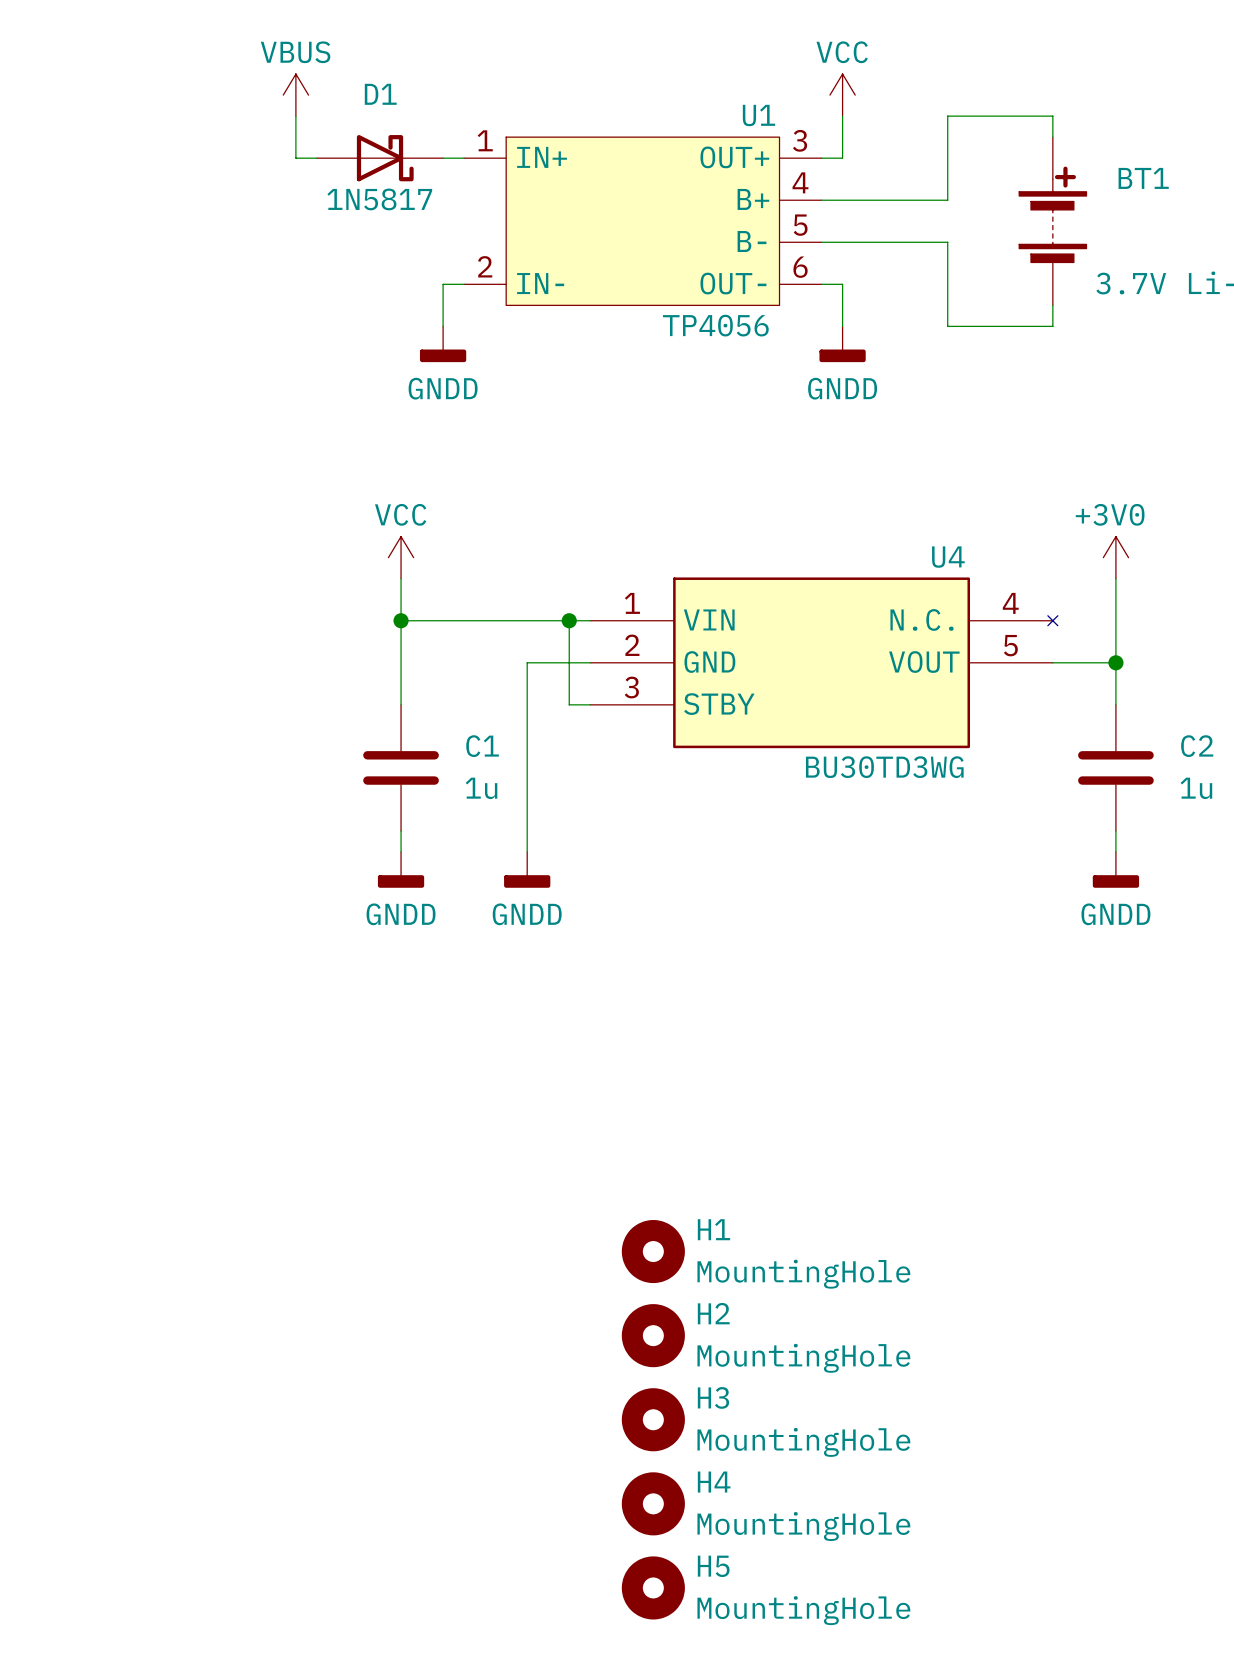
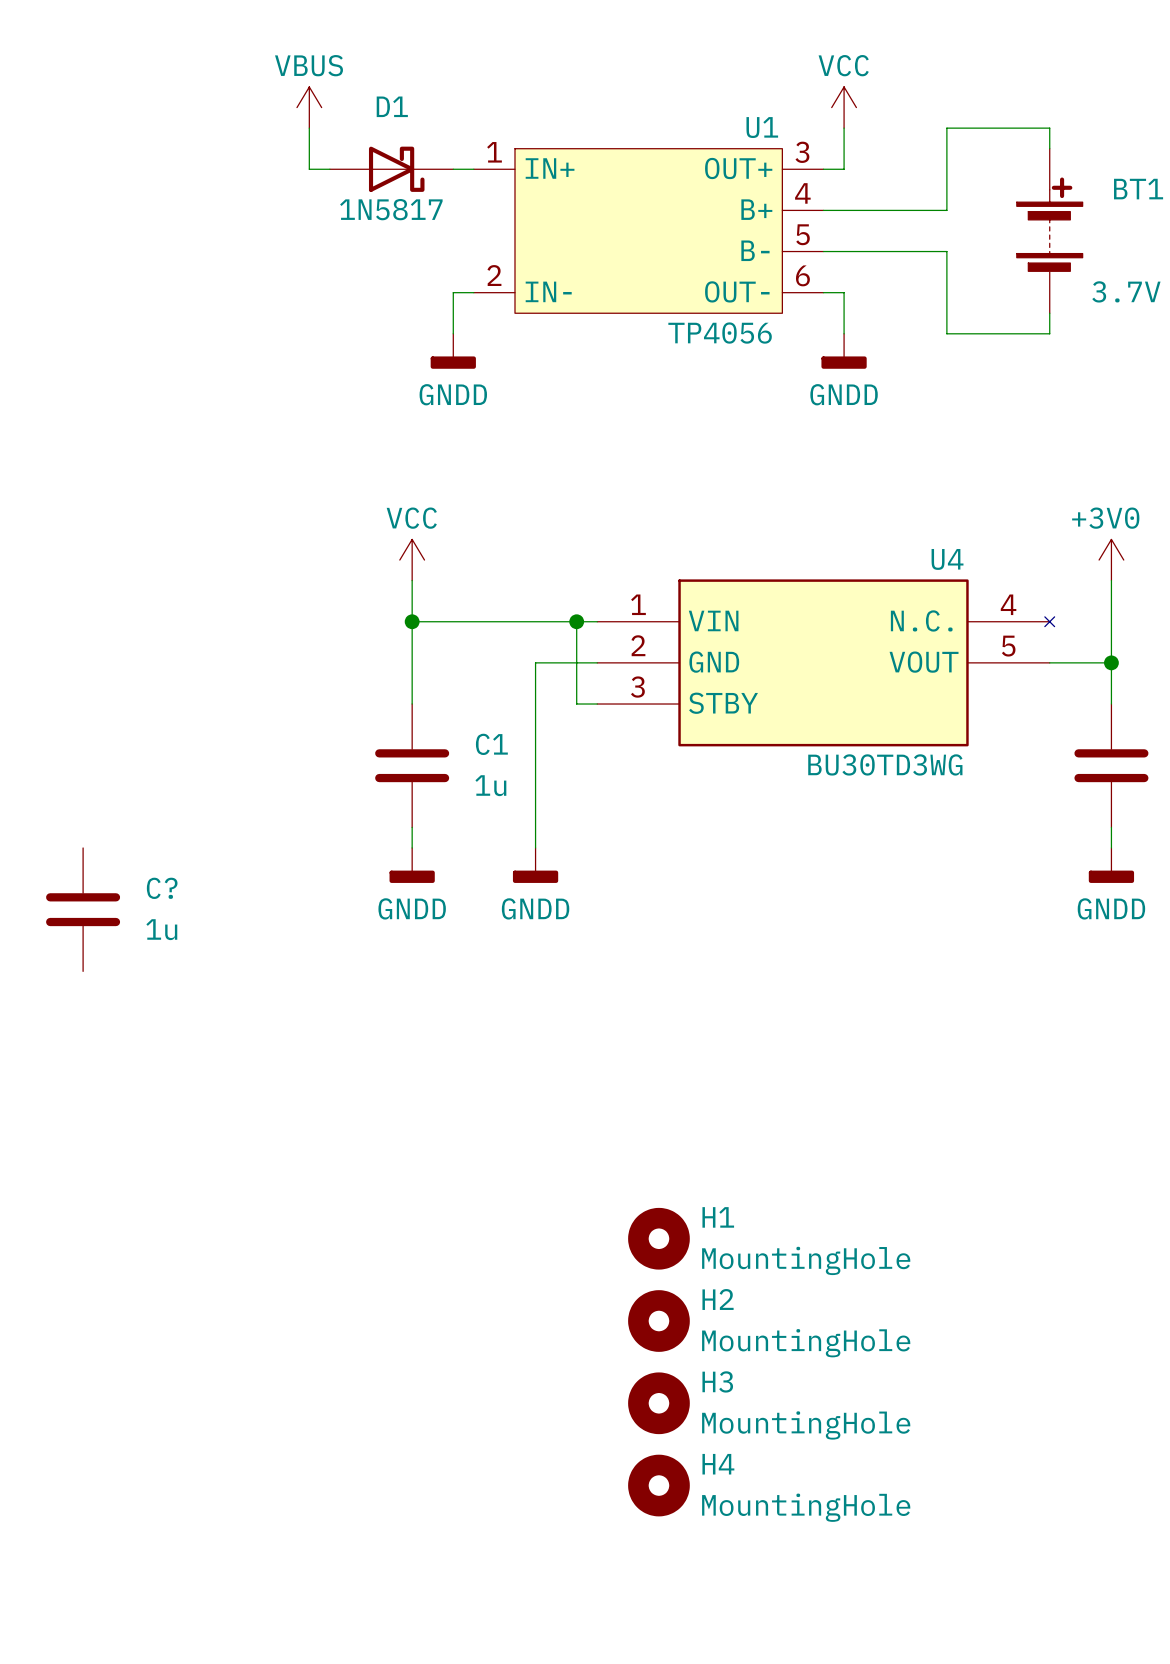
C?: none -> 1u (83, 909)
H5: MountingHole (653, 1587) -> none

